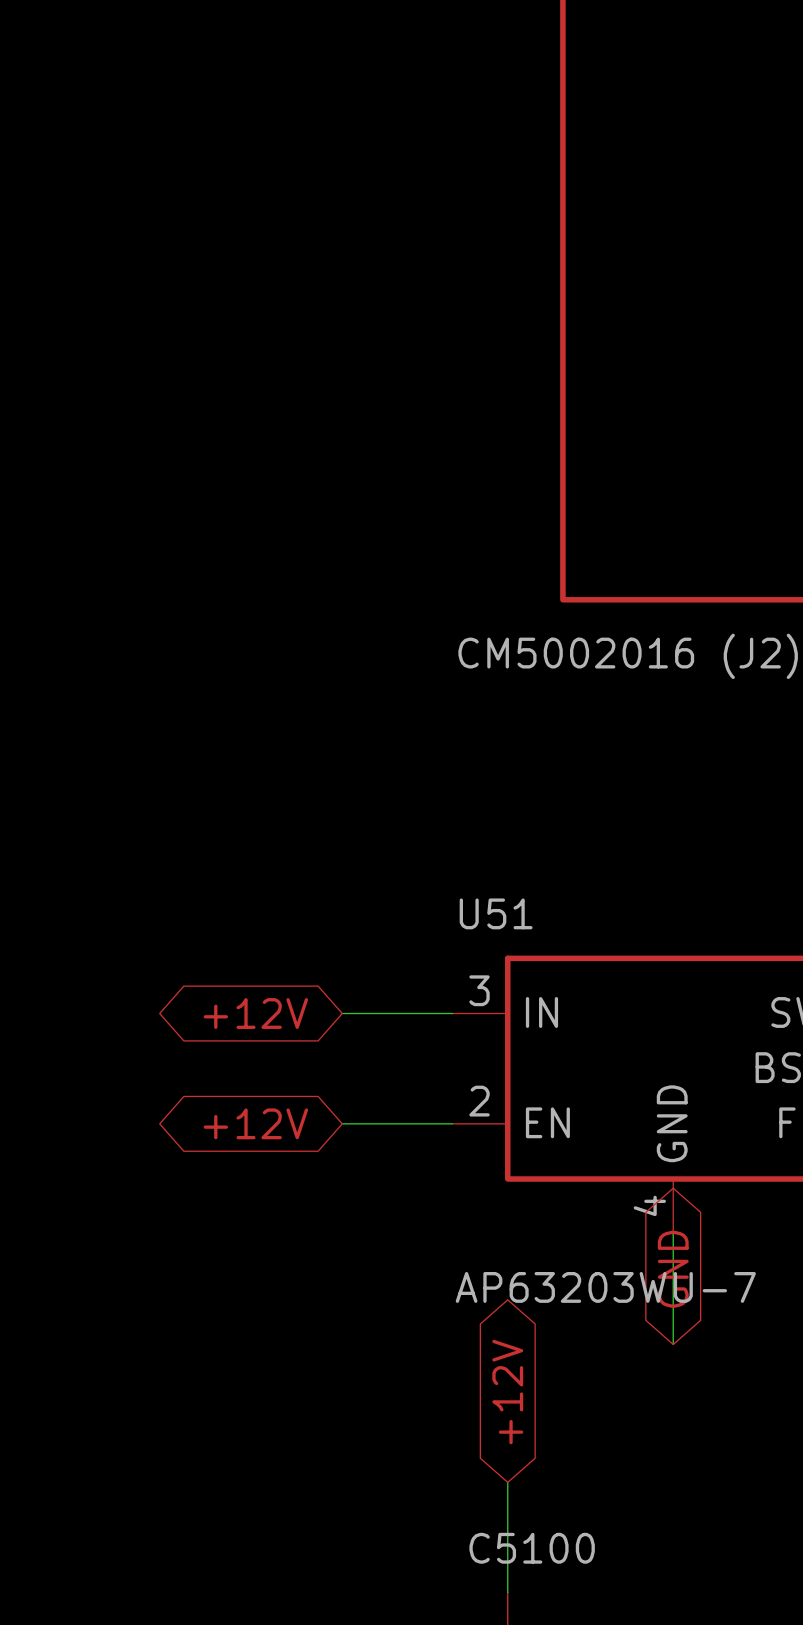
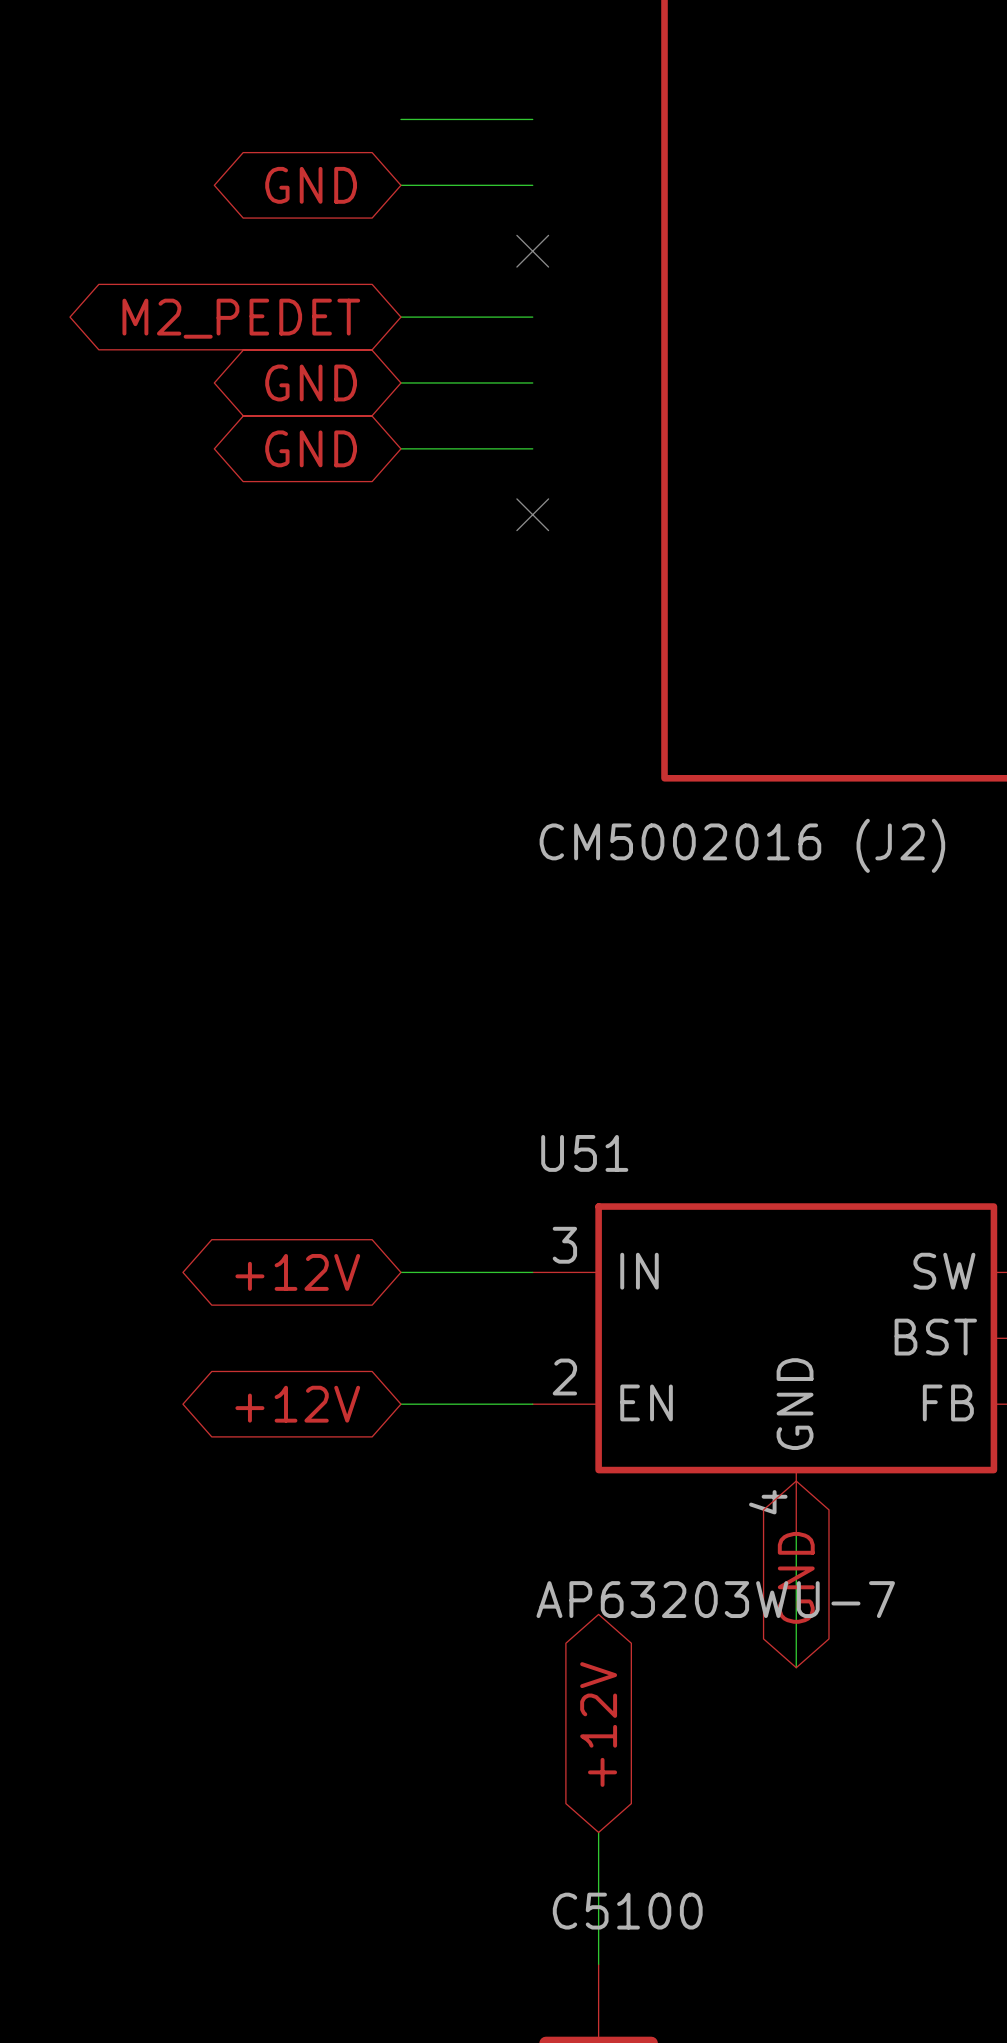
wire: none -> (400, 119) (532, 119)
global label: none -> GND (311, 185)
wire: none -> (400, 185) (532, 185)
no-connect mark: none -> (532, 251)
wire: none -> (400, 317) (532, 317)
global label: none -> M2_PEDET (241, 318)
global label: none -> GND (311, 382)
wire: none -> (400, 382) (532, 382)
global label: none -> GND (311, 448)
wire: none -> (400, 448) (532, 448)
no-connect mark: none -> (532, 514)

